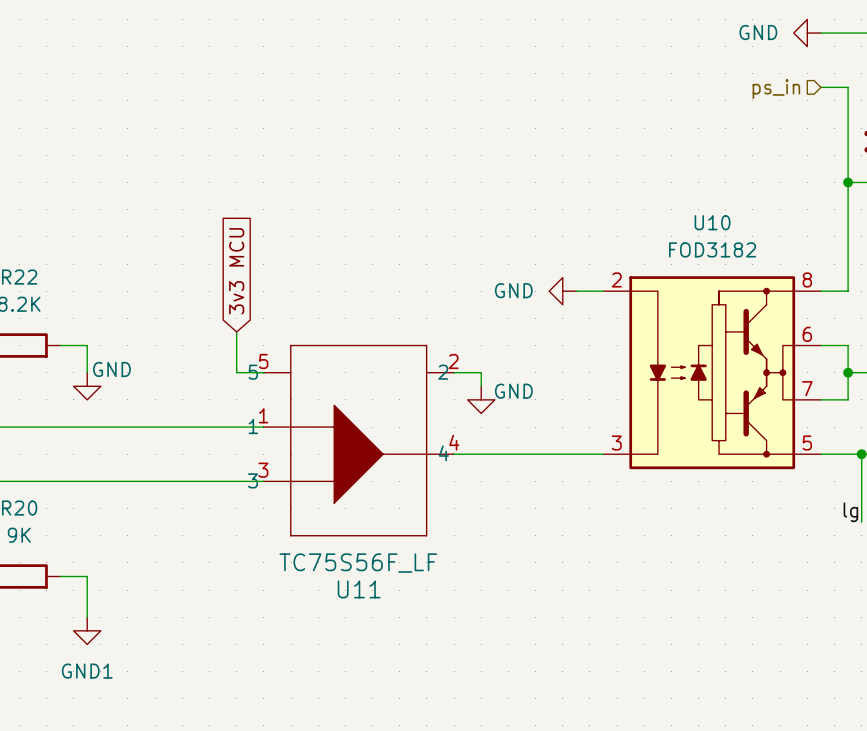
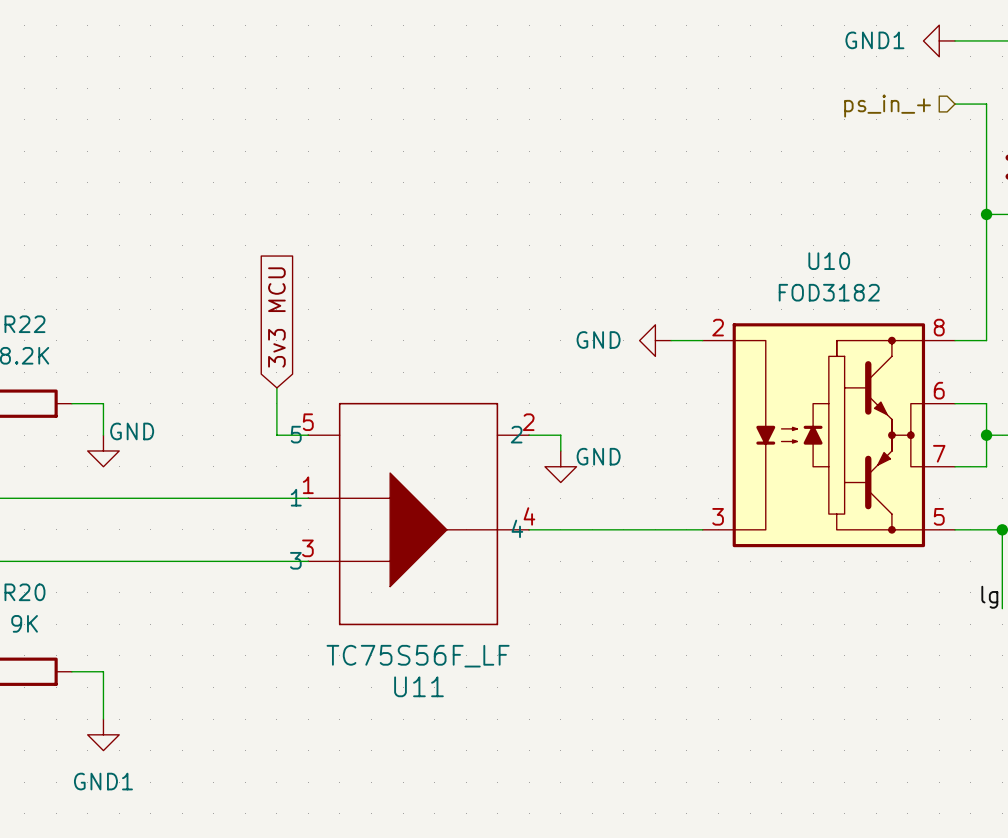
power symbol: GND (807, 33) -> GND1 (939, 40)
hierarchical label: ps_in (776, 89) -> ps_in_+ (887, 106)

